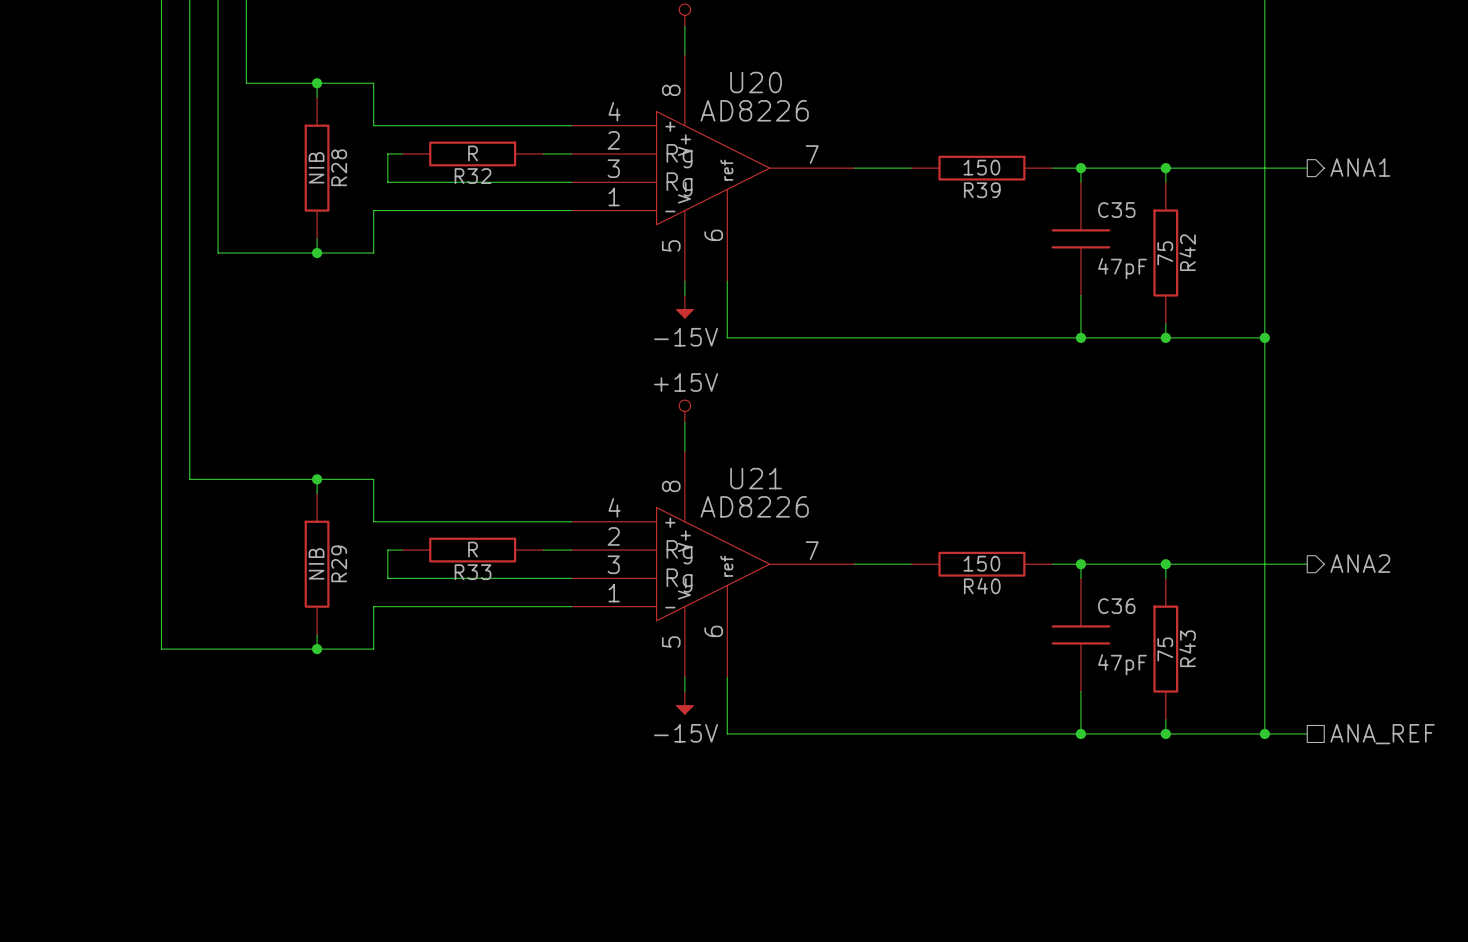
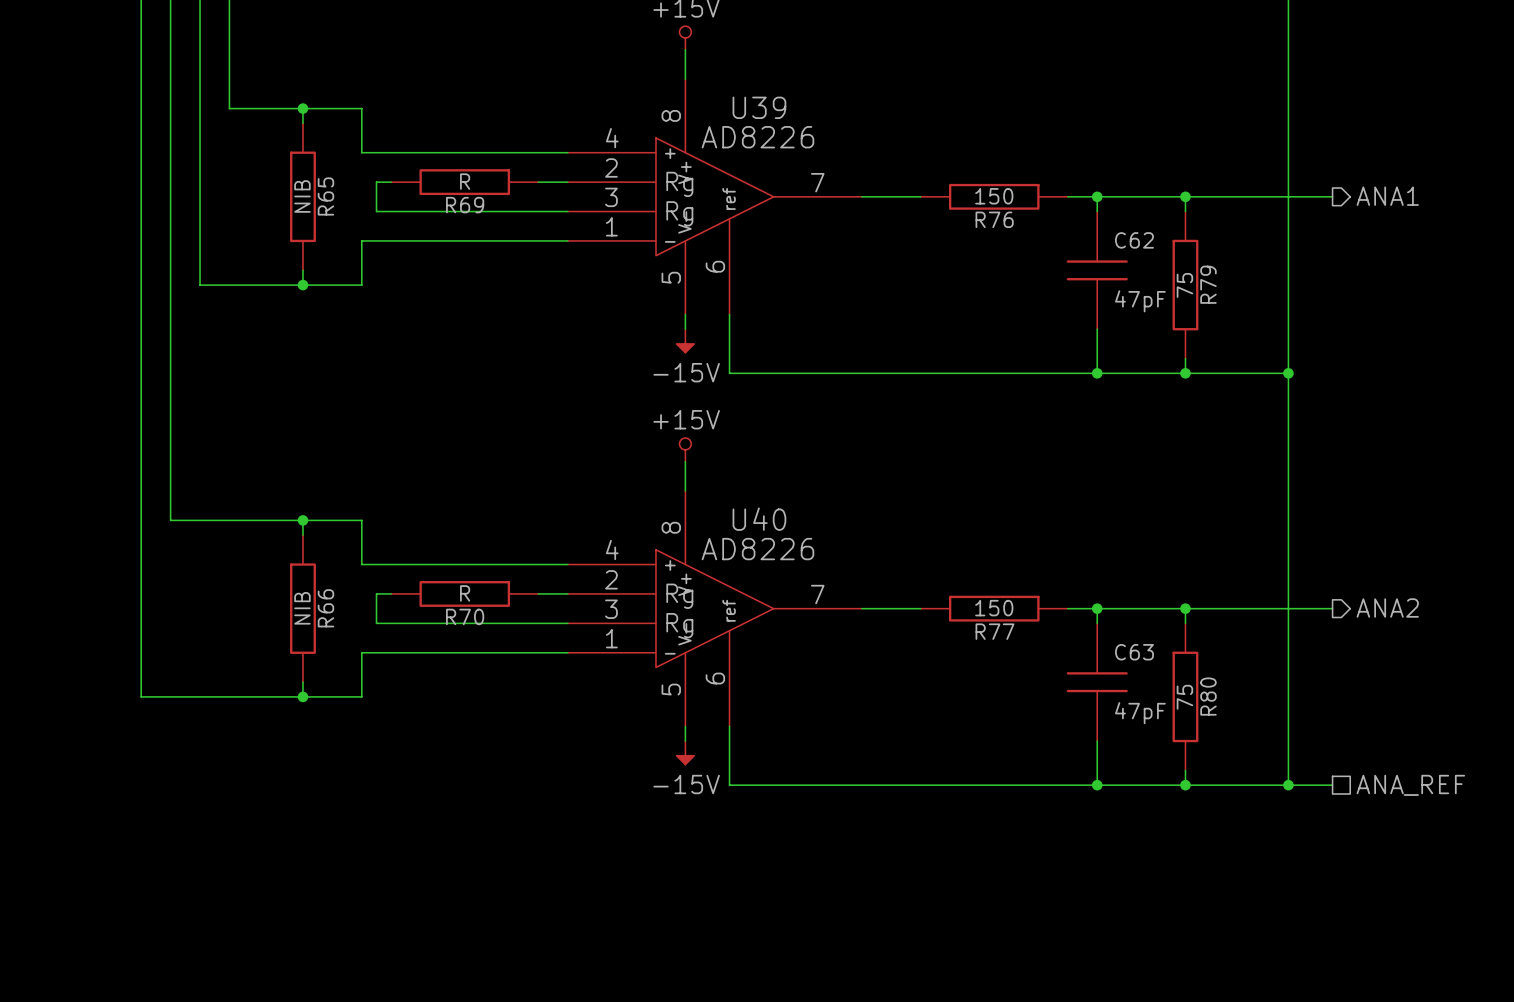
U20 name: U20 (756, 82) -> U39 (759, 107)
R28 name: R28 (339, 167) -> R65 (325, 196)
R32 name: R32 (473, 176) -> R69 (465, 205)
R39 name: R39 (982, 190) -> R76 (994, 219)
C35 name: C35 (1116, 210) -> C62 (1134, 240)
R42 name: R42 (1187, 252) -> R79 (1208, 284)
U21 name: U21 (756, 478) -> U40 (759, 519)
R29 name: R29 (339, 563) -> R66 (325, 608)
R33 name: R33 (473, 572) -> R70 (465, 616)
R40 name: R40 (982, 585) -> R77 (994, 631)
C36 name: C36 (1116, 606) -> C63 (1134, 652)
R43 name: R43 (1187, 648) -> R80 (1208, 696)

